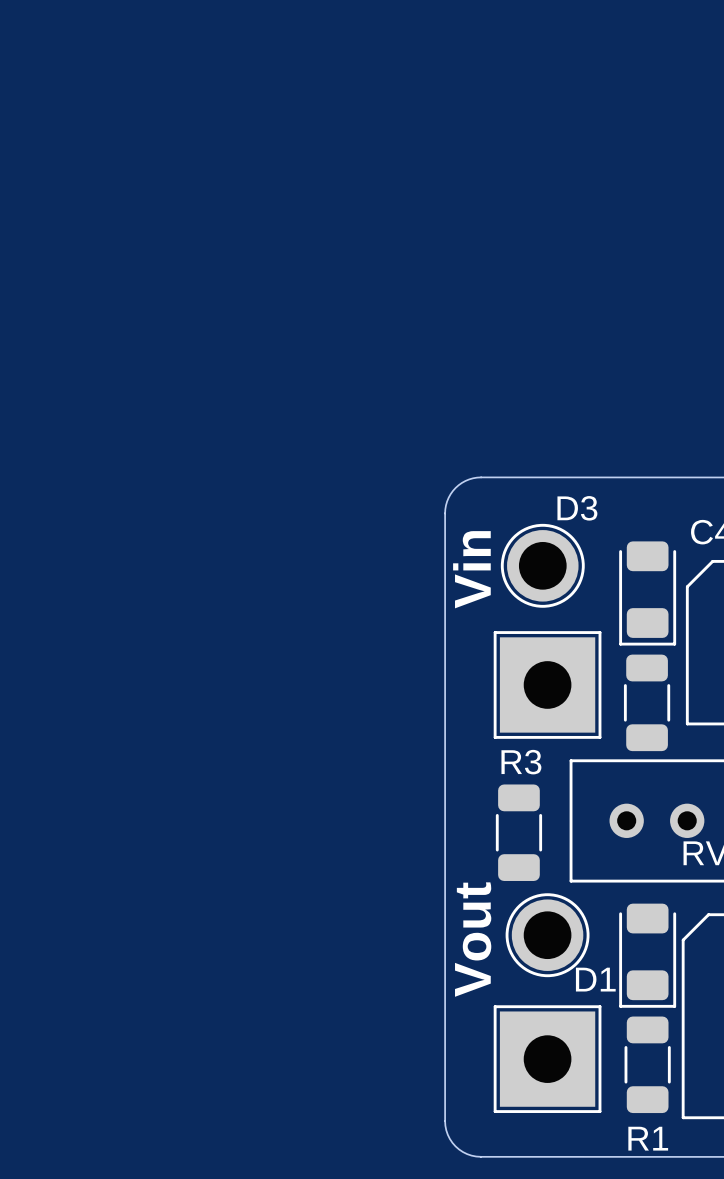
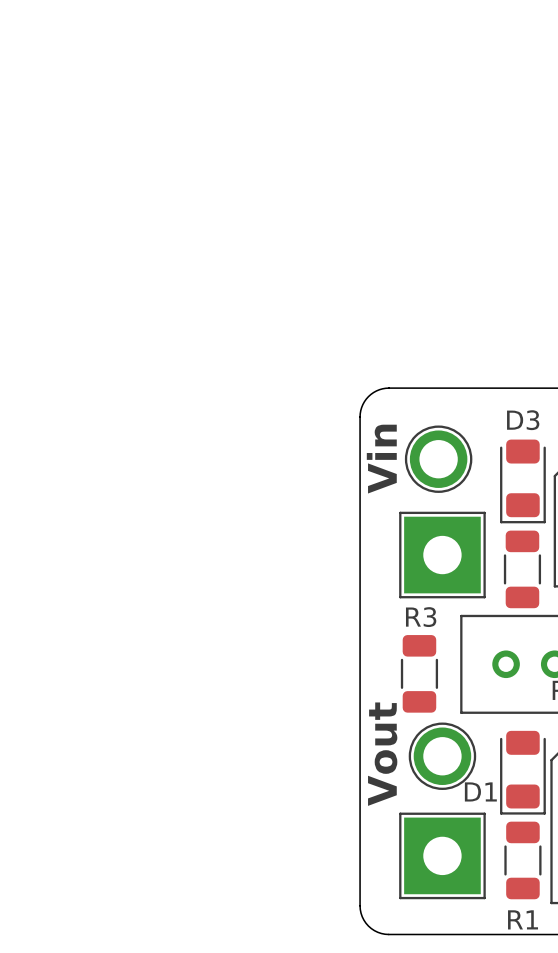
D3 name position: D3 (577, 508) -> D3 (523, 420)

